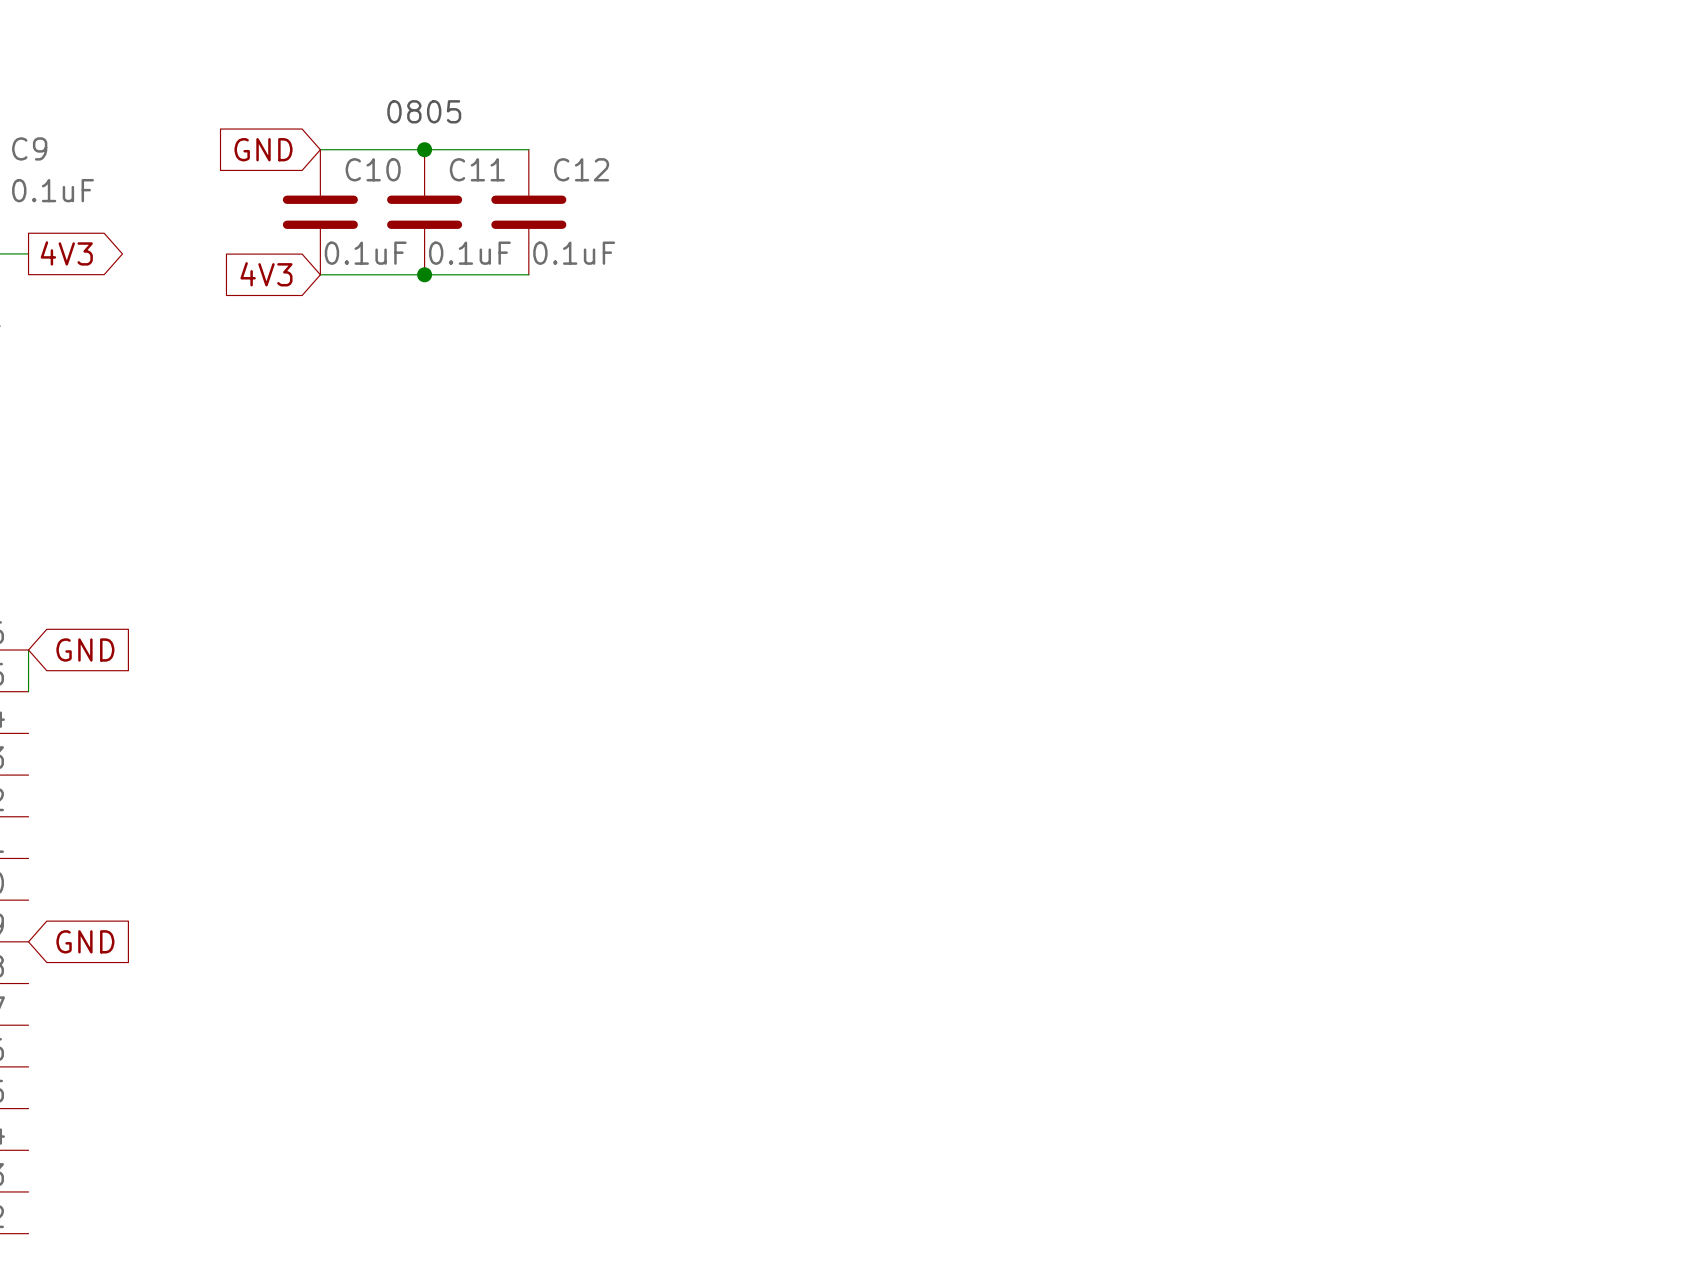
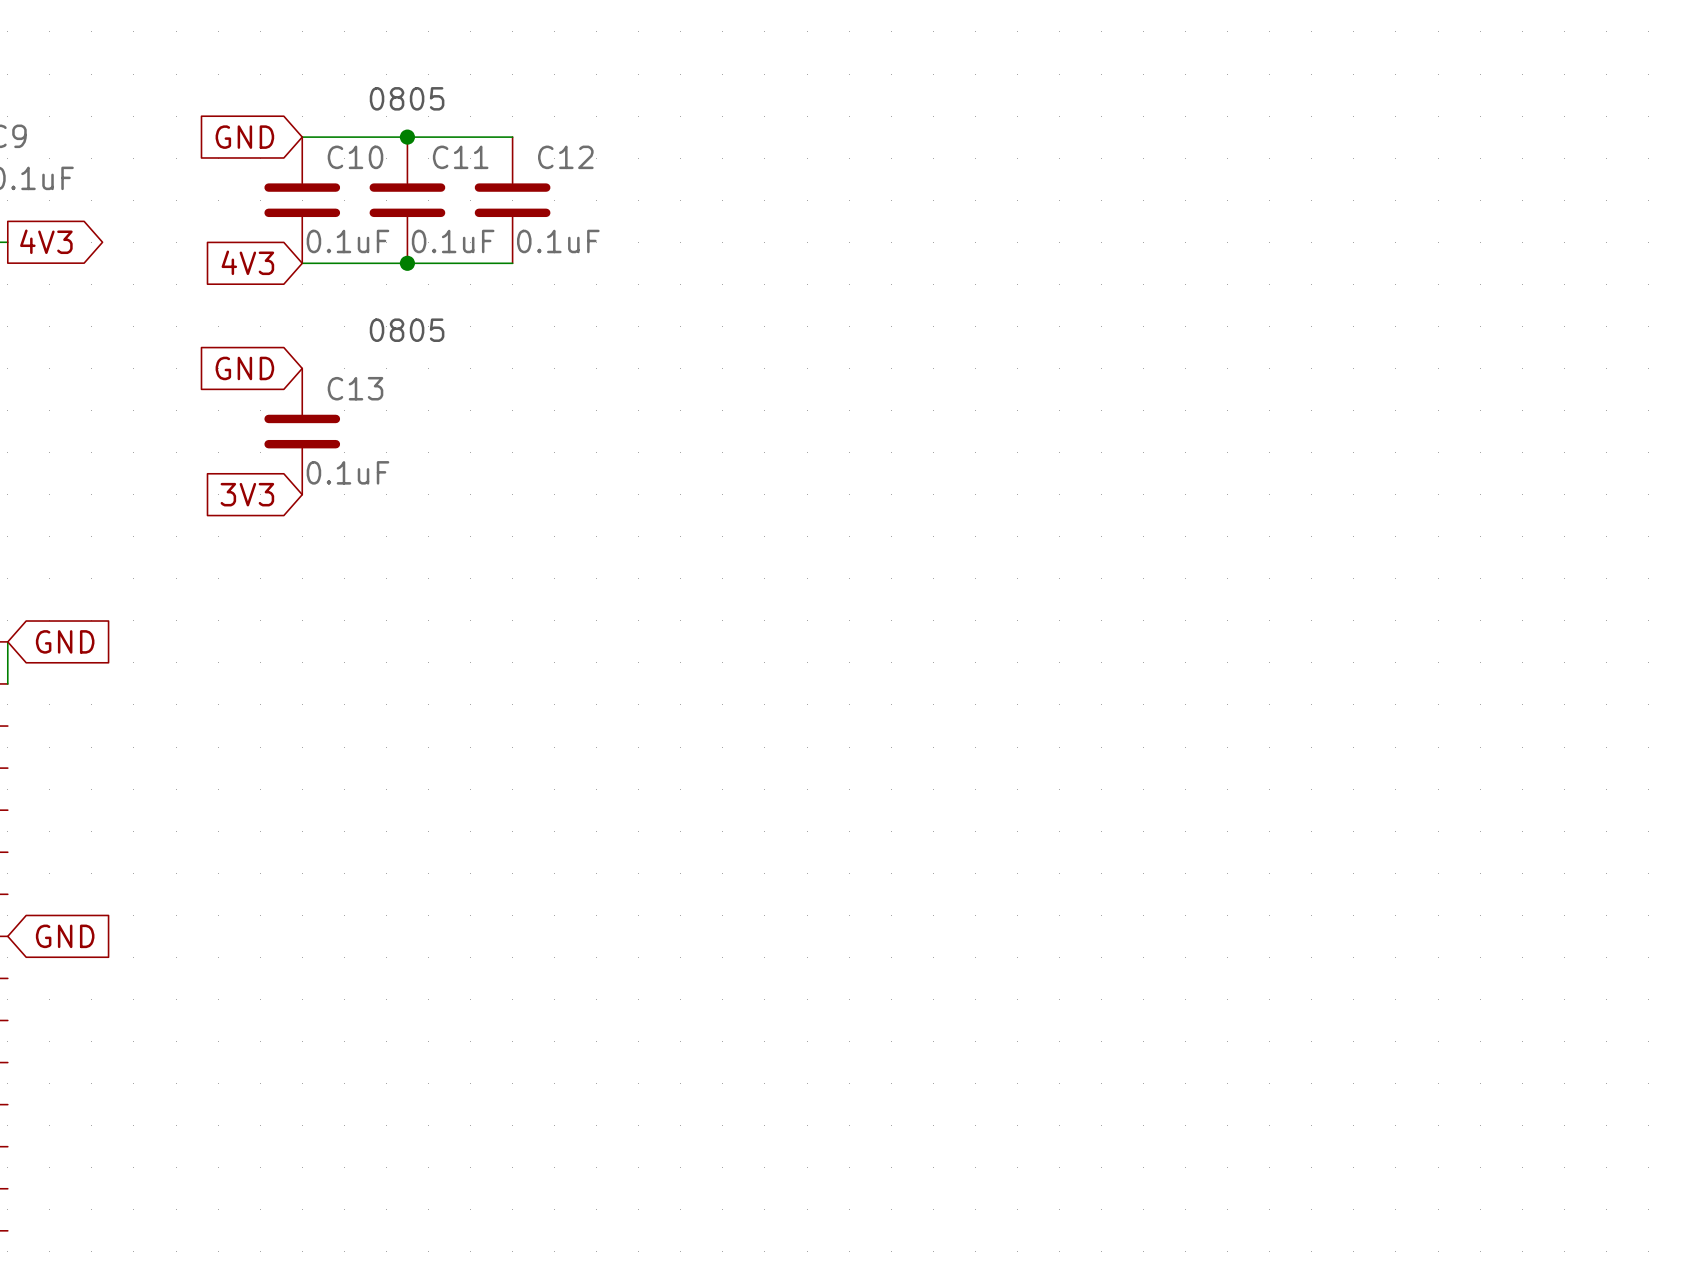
text: none -> 0805 (407, 330)
global label: none -> GND (244, 368)
C13: none -> 0.1uF (302, 431)
global label: none -> 3V3 (247, 494)

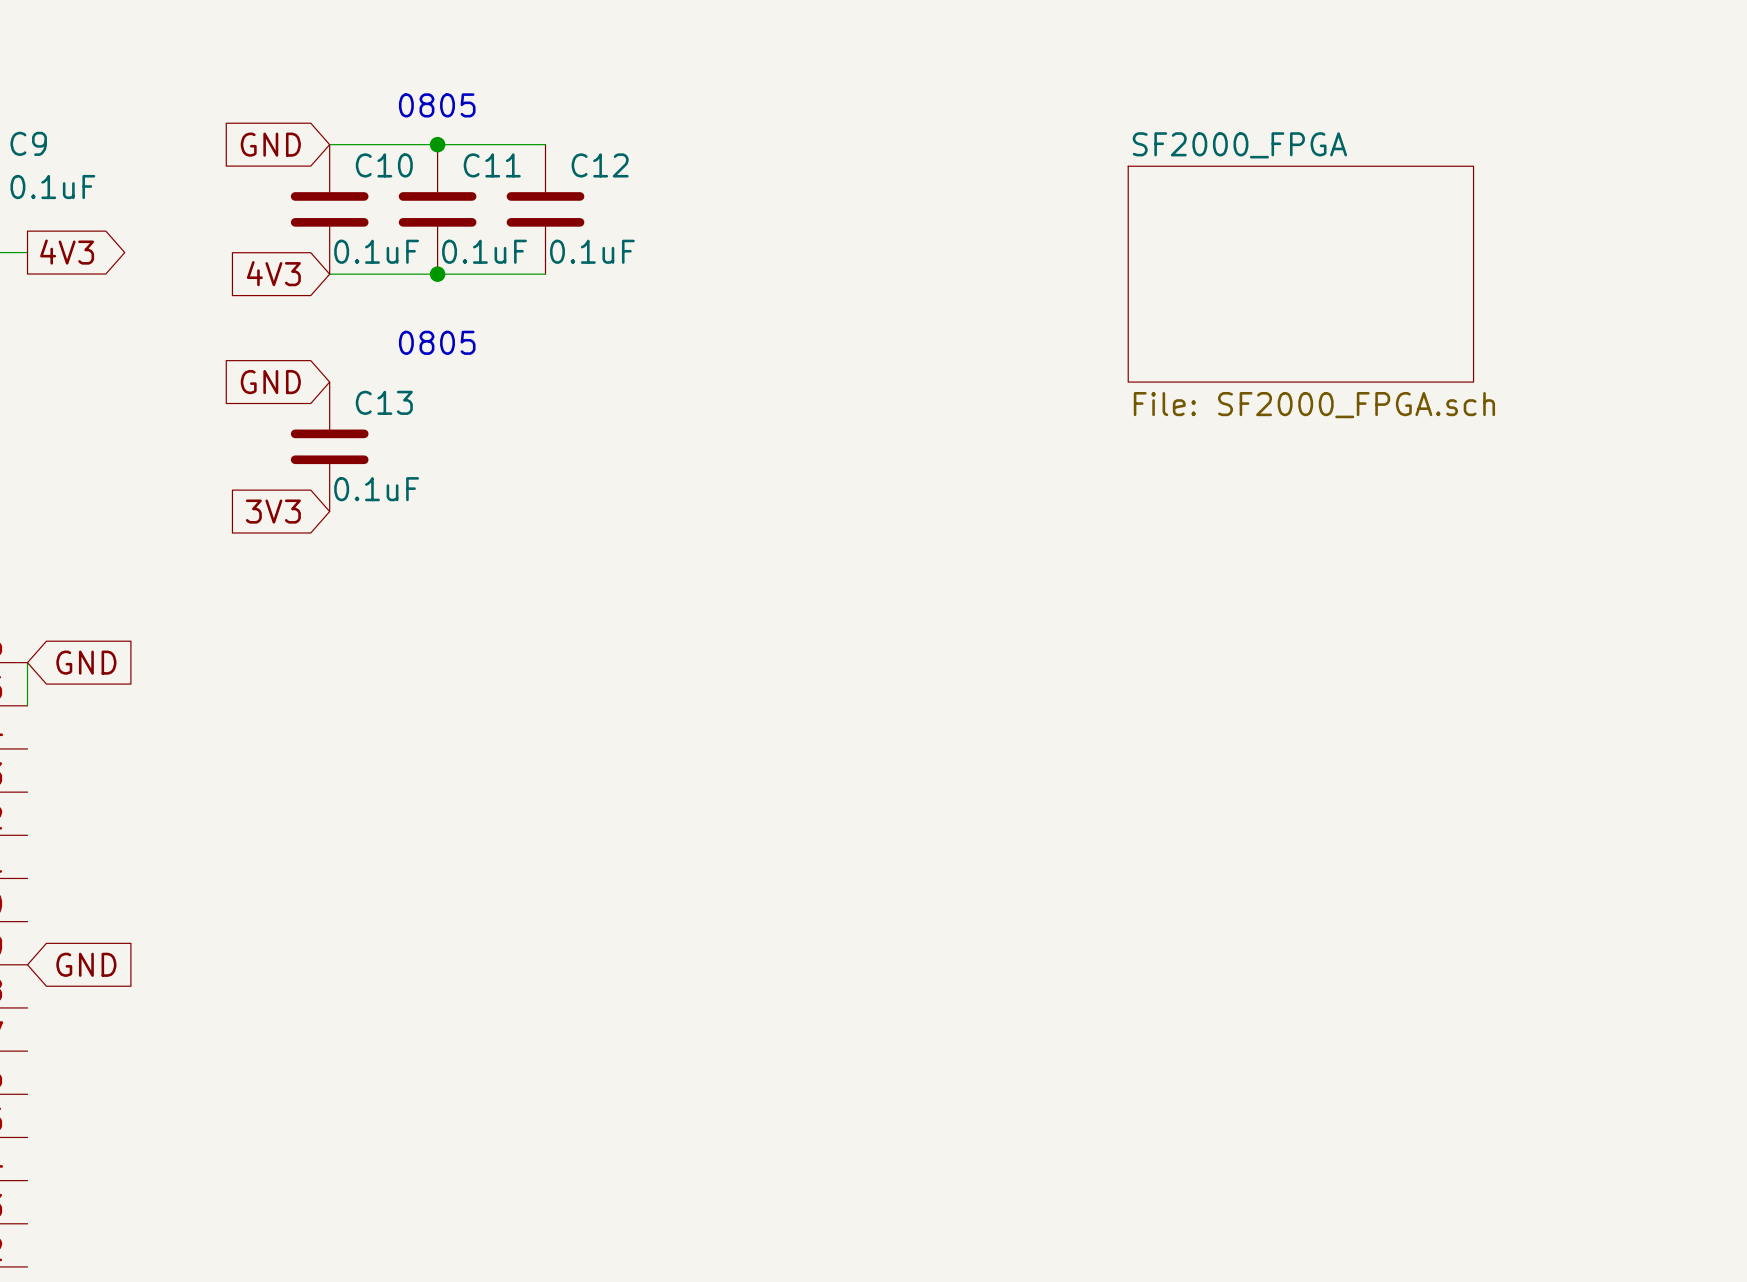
sheet SF2000_FPGA: none -> File: SF2000_FPGA.sch (1300, 274)

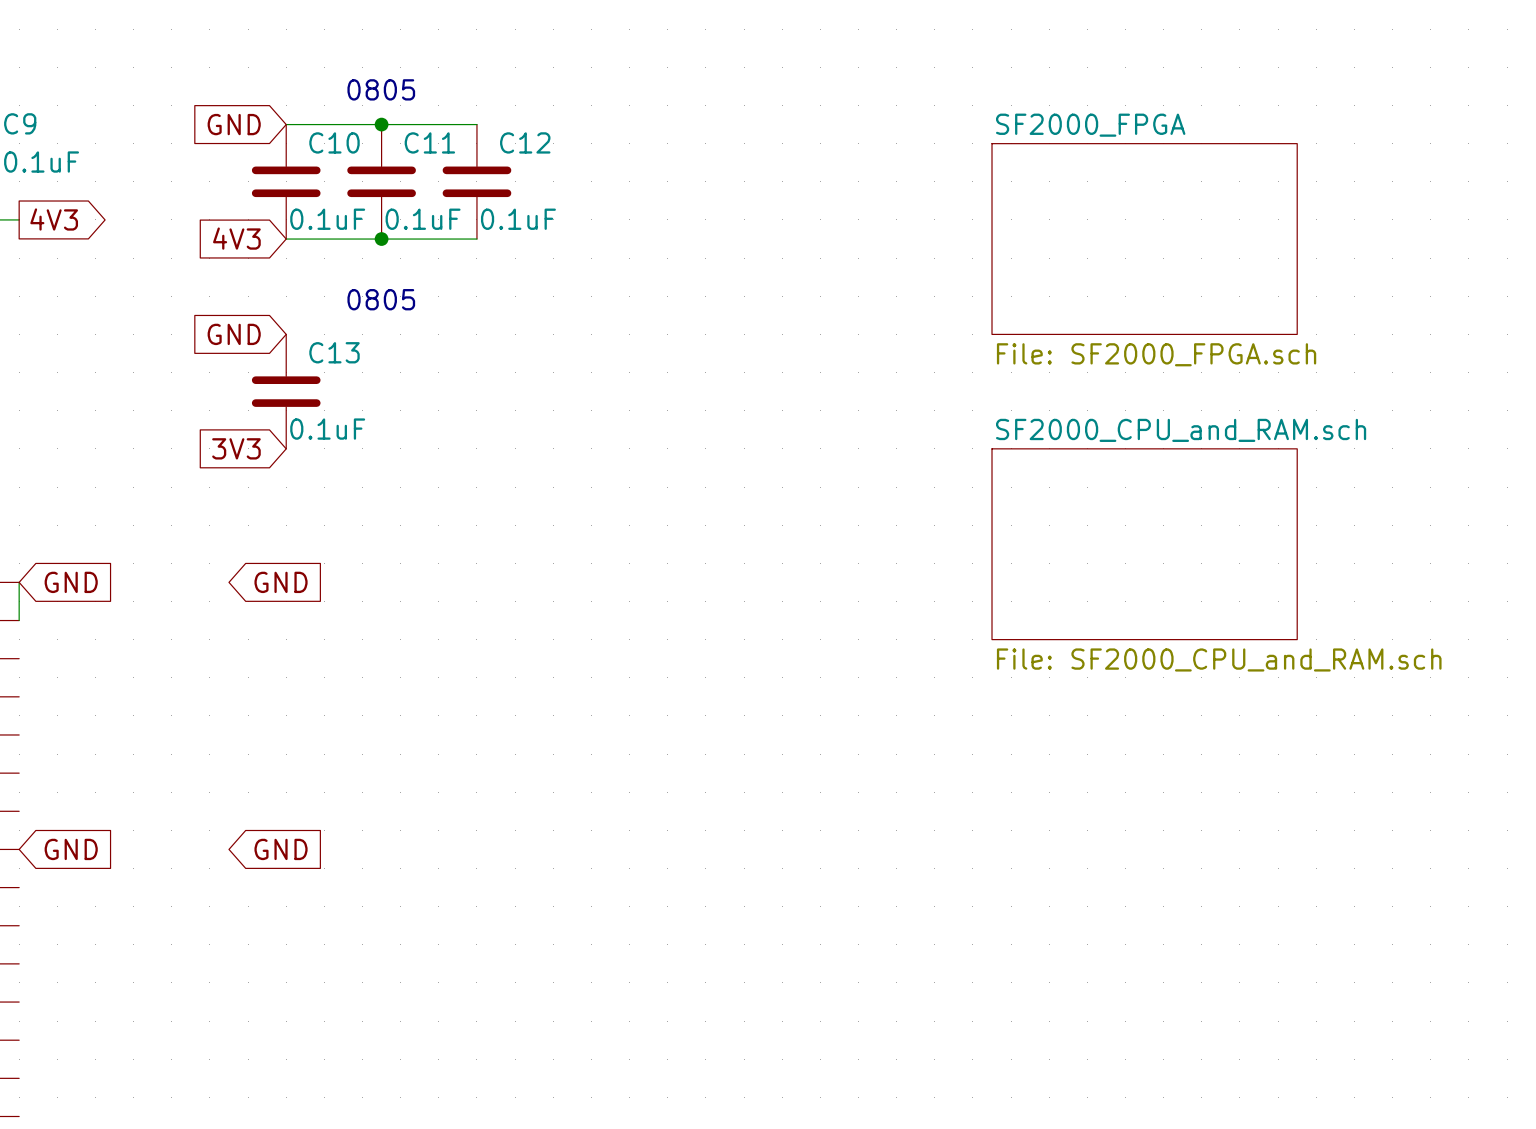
sheet SF2000_CPU_and_RAM.sch: none -> File: SF2000_CPU_and_RAM.sch (1144, 544)
global label: none -> GND (281, 582)
global label: none -> GND (281, 849)

